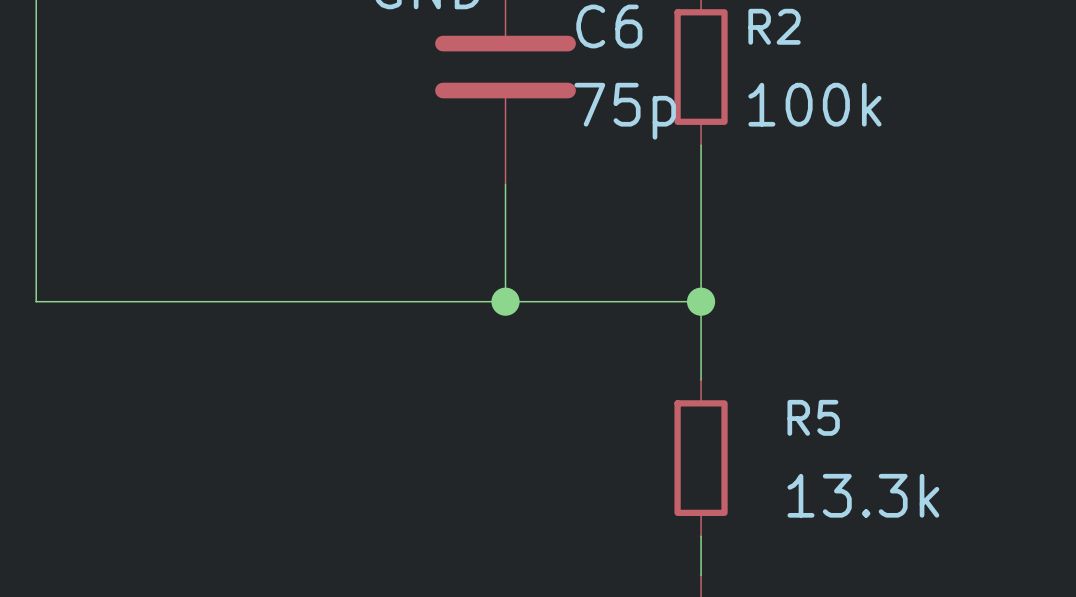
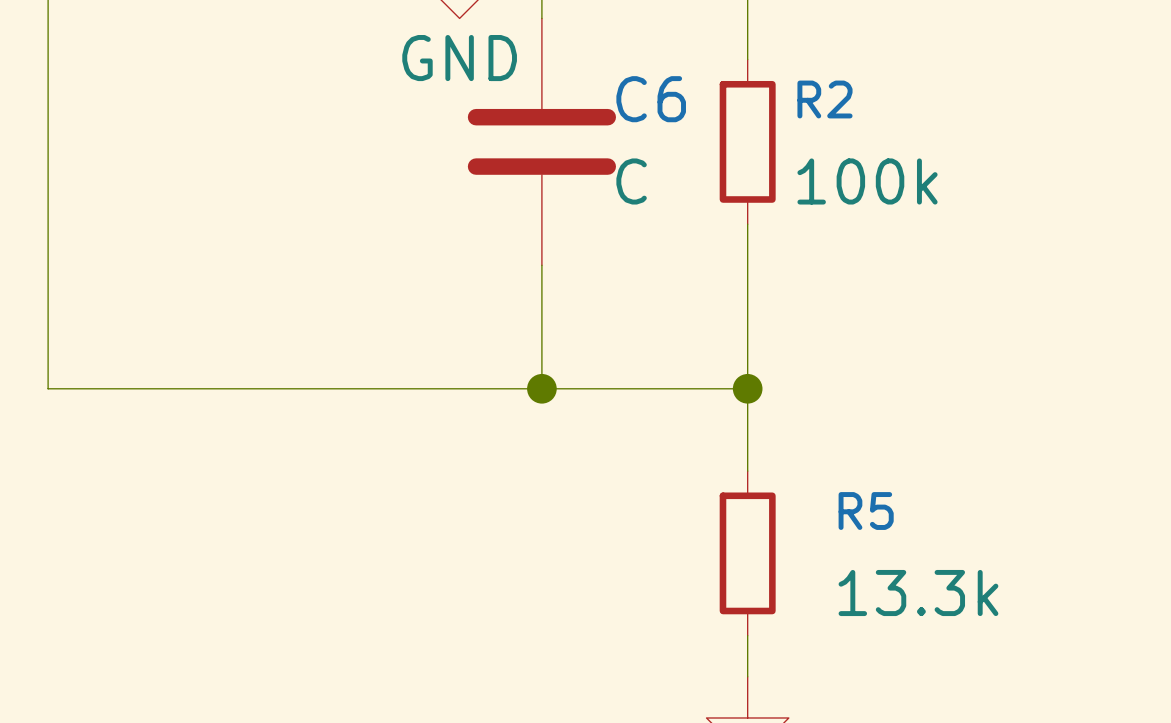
C6 value: 75p (625, 111) -> C (631, 181)

